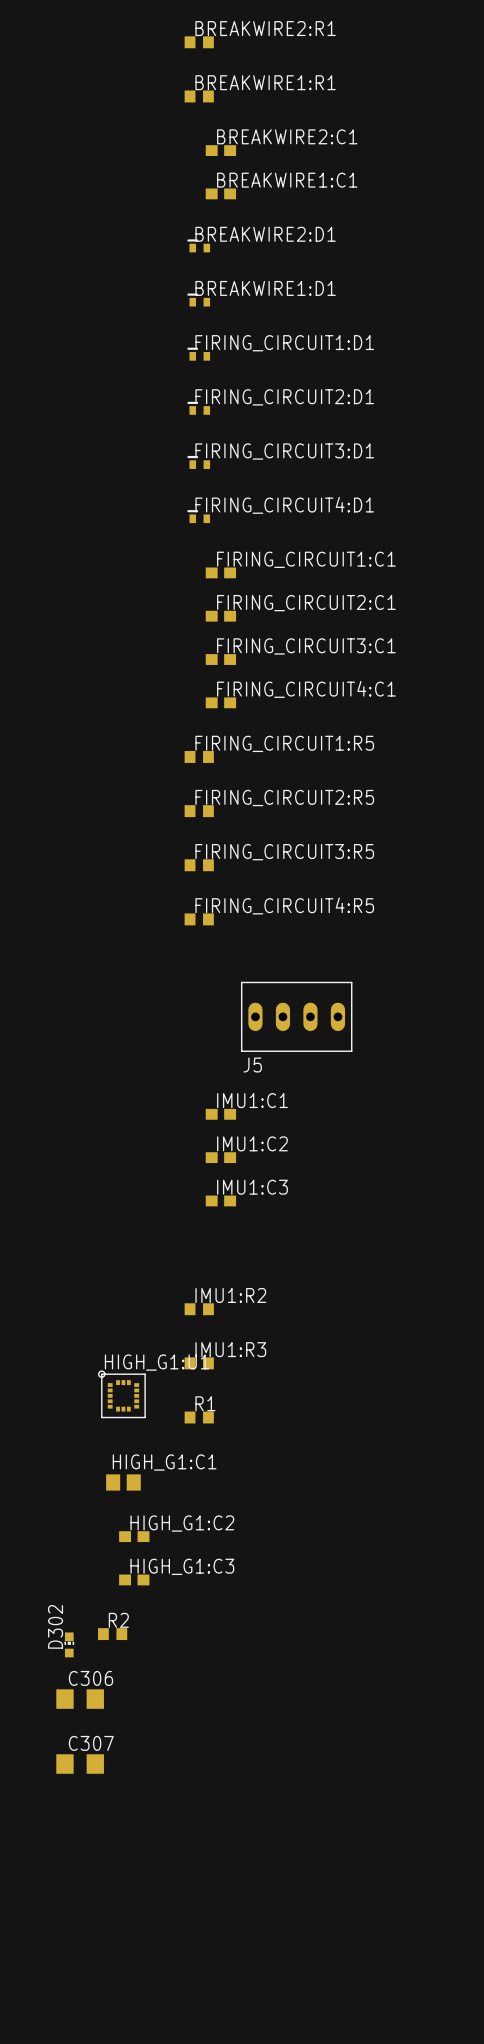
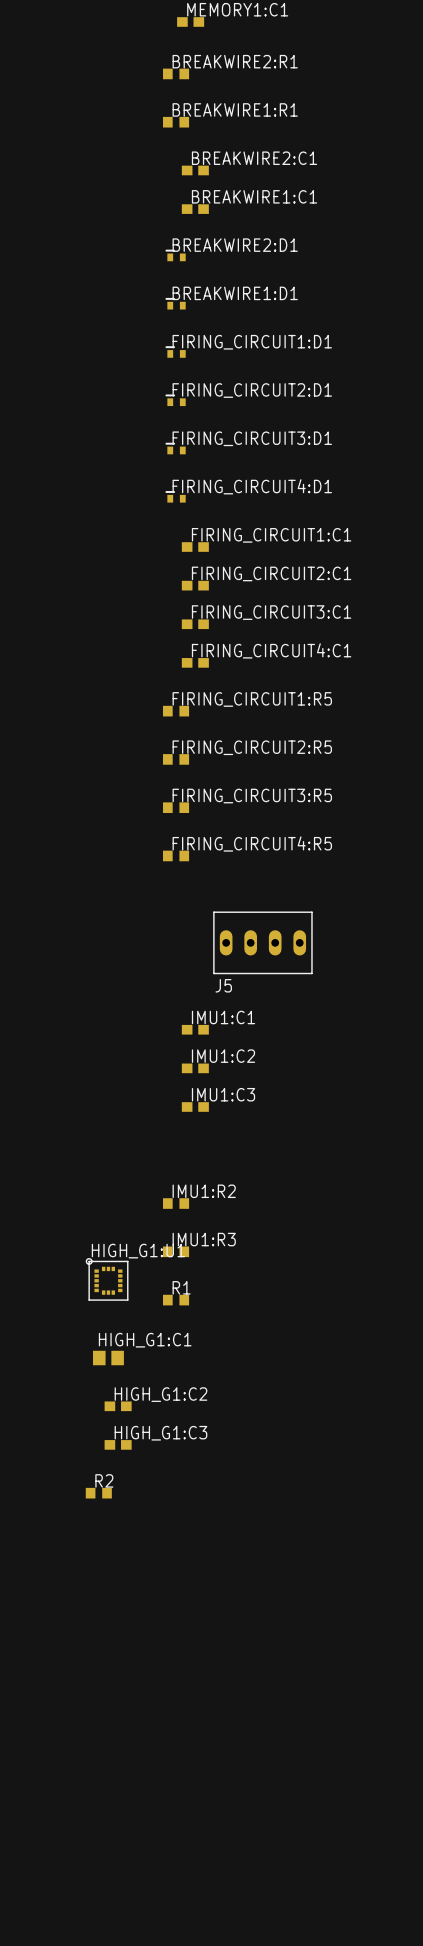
D302: (69, 1644) -> none
C306: (80, 1699) -> none
C307: (80, 1764) -> none

